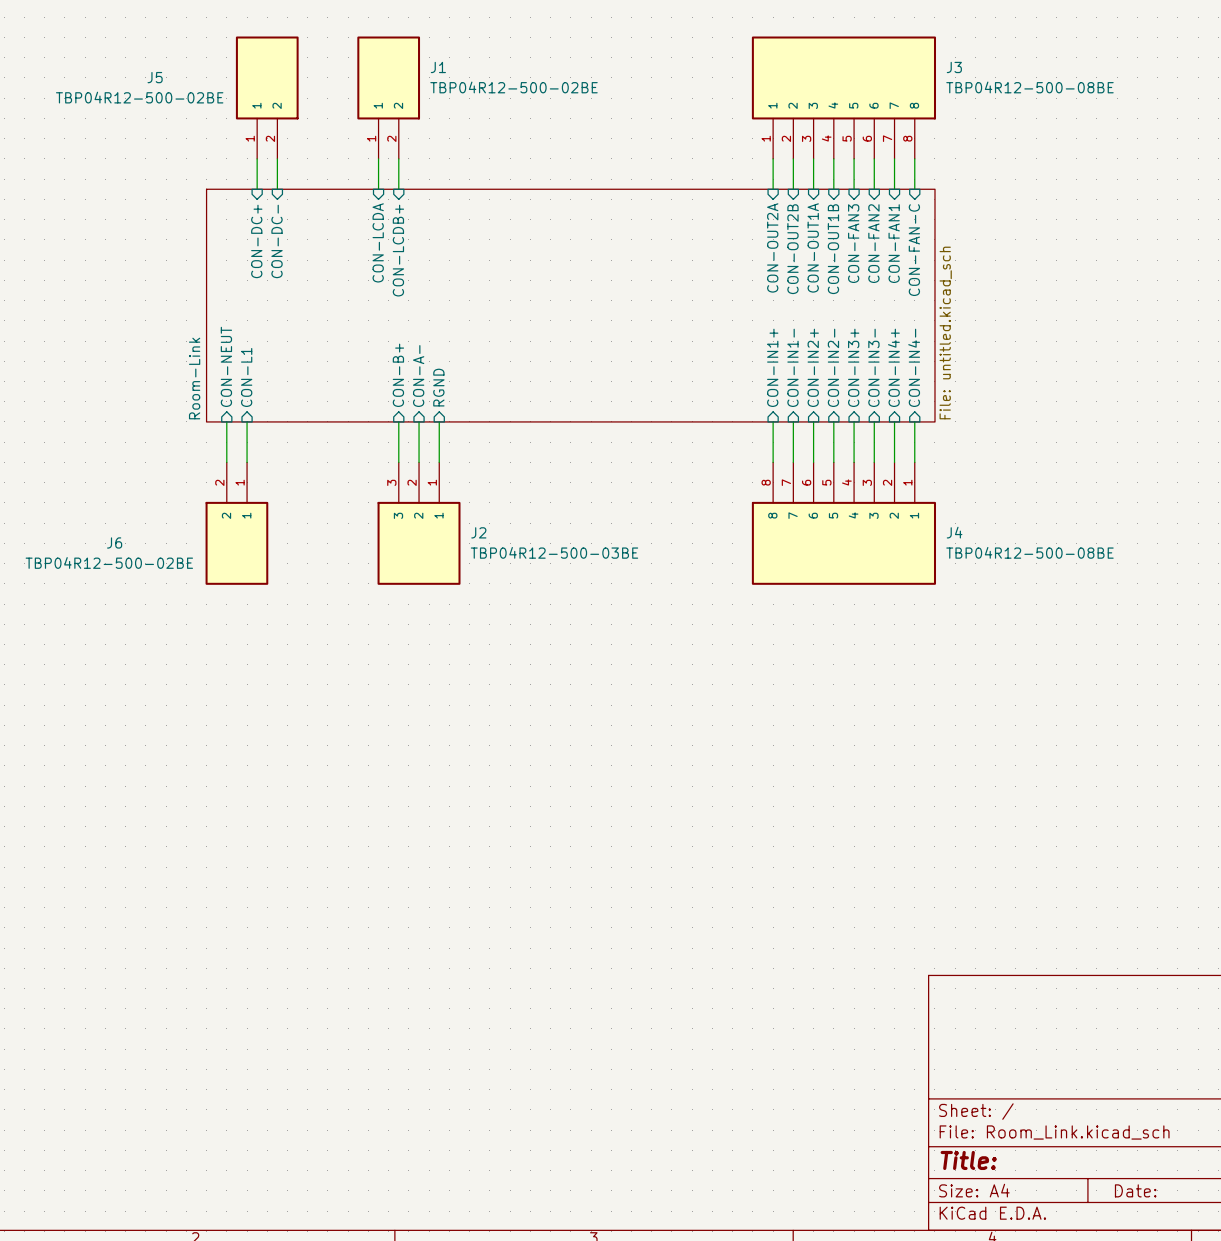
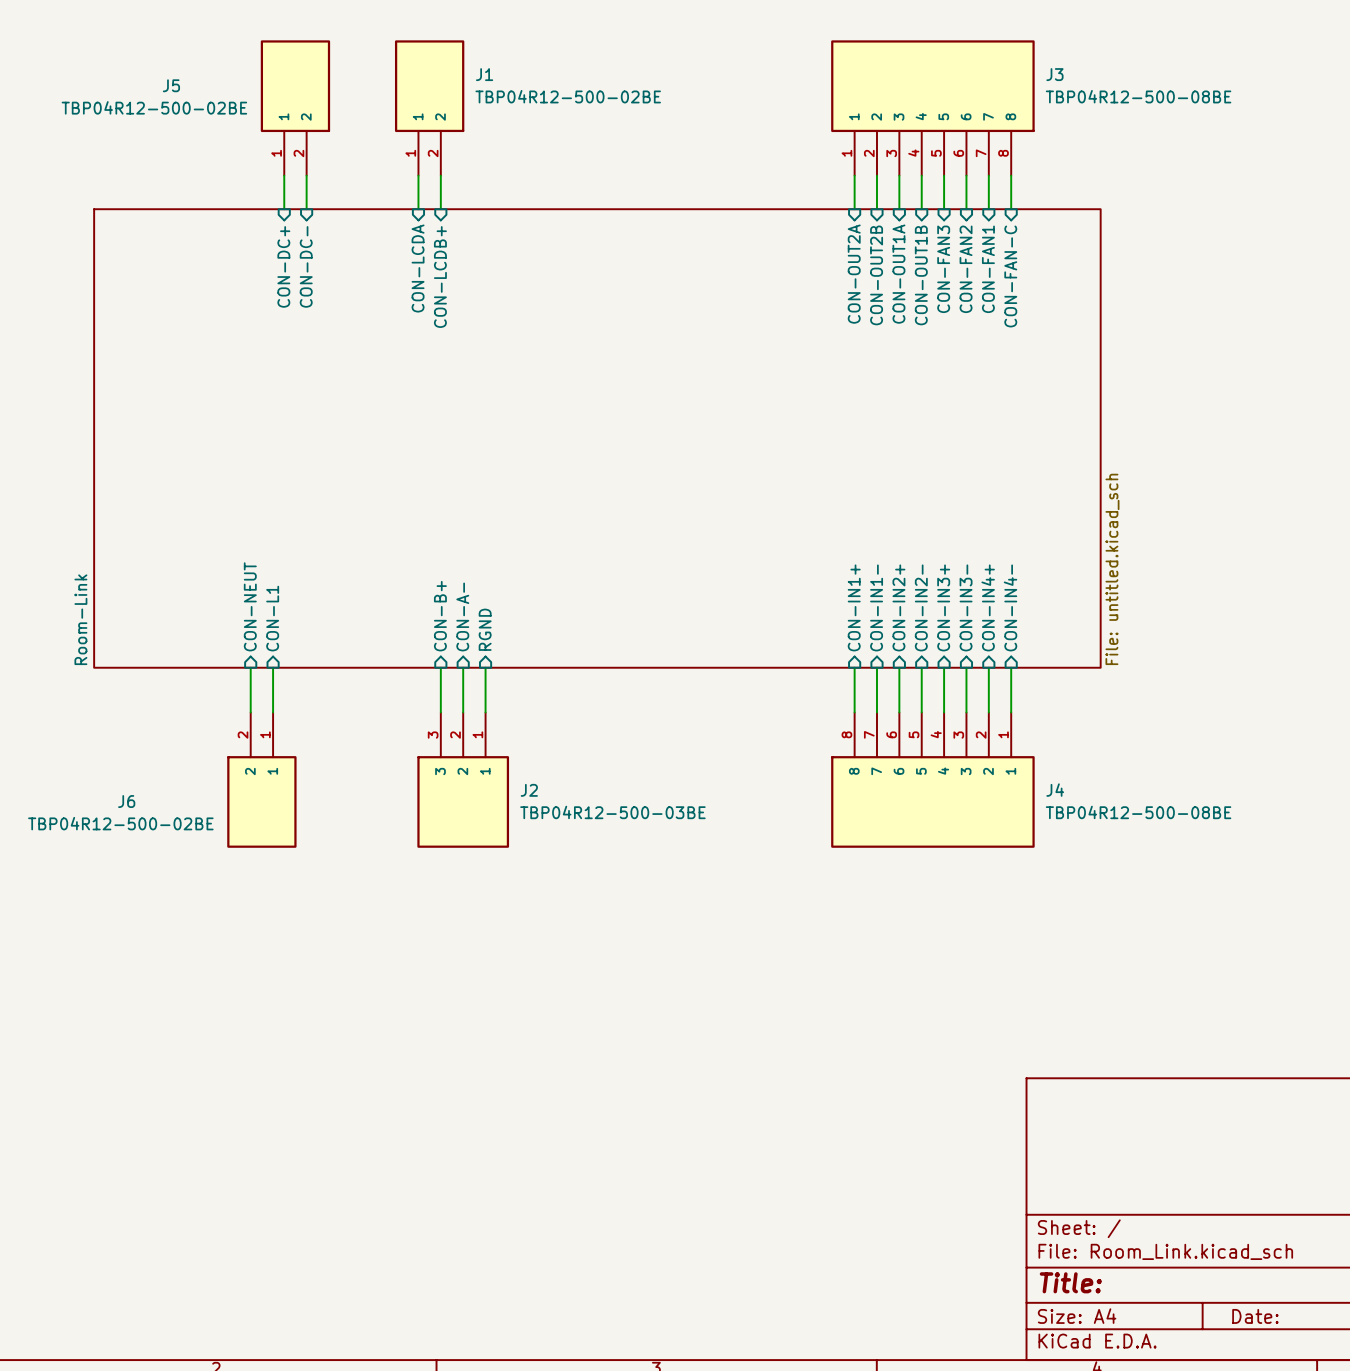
sheet Room-Link: File: untitled.kicad_sch (570, 305) -> none
sheet pin position: CON-NEUT (226, 366) -> CON-NEUT (250, 606)
sheet pin position: CON-IN1+ (772, 367) -> CON-IN1+ (854, 607)
sheet pin position: CON-IN1- (792, 367) -> CON-IN1- (876, 607)
sheet pin position: CON-IN2+ (813, 367) -> CON-IN2+ (898, 607)
sheet pin position: CON-IN2- (833, 367) -> CON-IN2- (921, 607)
sheet pin position: CON-IN3+ (853, 367) -> CON-IN3+ (943, 607)
sheet pin position: CON-IN3- (873, 367) -> CON-IN3- (966, 607)
sheet pin position: CON-IN4+ (893, 367) -> CON-IN4+ (988, 607)
sheet pin position: CON-IN4- (914, 367) -> CON-IN4- (1010, 607)
sheet pin position: CON-B+ (398, 375) -> CON-B+ (440, 616)
sheet pin position: CON-A- (418, 376) -> CON-A- (462, 616)
sheet pin position: CON-L1 (246, 377) -> CON-L1 (272, 618)
sheet pin position: RGND (438, 387) -> RGND (485, 629)
sheet Room-Link: none -> File: untitled.kicad_sch (597, 438)
wire: (226, 421) (226, 462) -> (250, 667) (250, 712)
wire: (247, 421) (247, 462) -> (273, 667) (273, 712)
wire: (398, 421) (398, 462) -> (440, 667) (440, 712)
wire: (419, 421) (419, 462) -> (463, 667) (463, 712)
wire: (439, 421) (439, 462) -> (485, 667) (485, 712)
wire: (773, 421) (773, 462) -> (854, 667) (854, 712)
wire: (793, 421) (793, 462) -> (876, 667) (876, 712)
wire: (813, 421) (813, 462) -> (899, 667) (899, 712)
wire: (833, 421) (833, 462) -> (921, 667) (921, 712)
wire: (854, 421) (854, 462) -> (944, 667) (944, 712)
wire: (874, 421) (874, 462) -> (966, 667) (966, 712)
wire: (894, 421) (894, 462) -> (988, 667) (988, 712)
wire: (914, 421) (914, 462) -> (1011, 667) (1011, 712)
J6 position: (236, 523) -> (261, 780)
J2 position: (419, 523) -> (463, 780)
J4 position: (843, 523) -> (932, 780)

